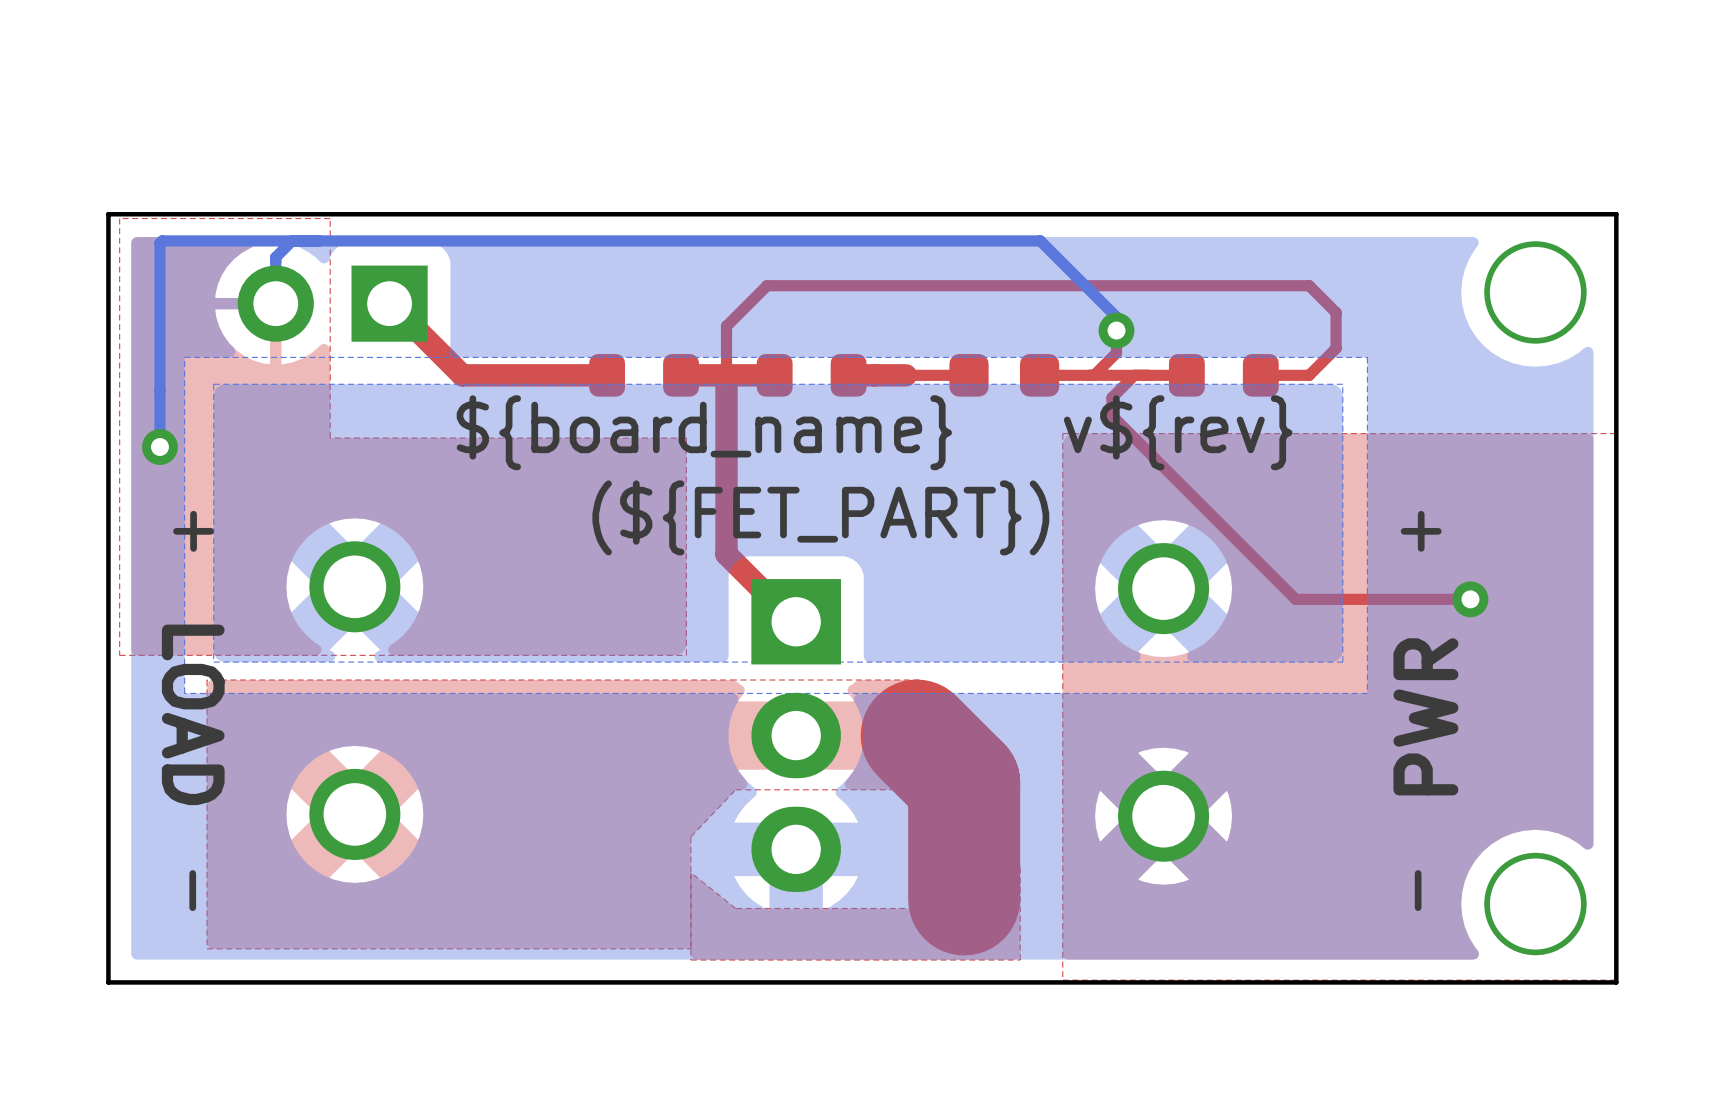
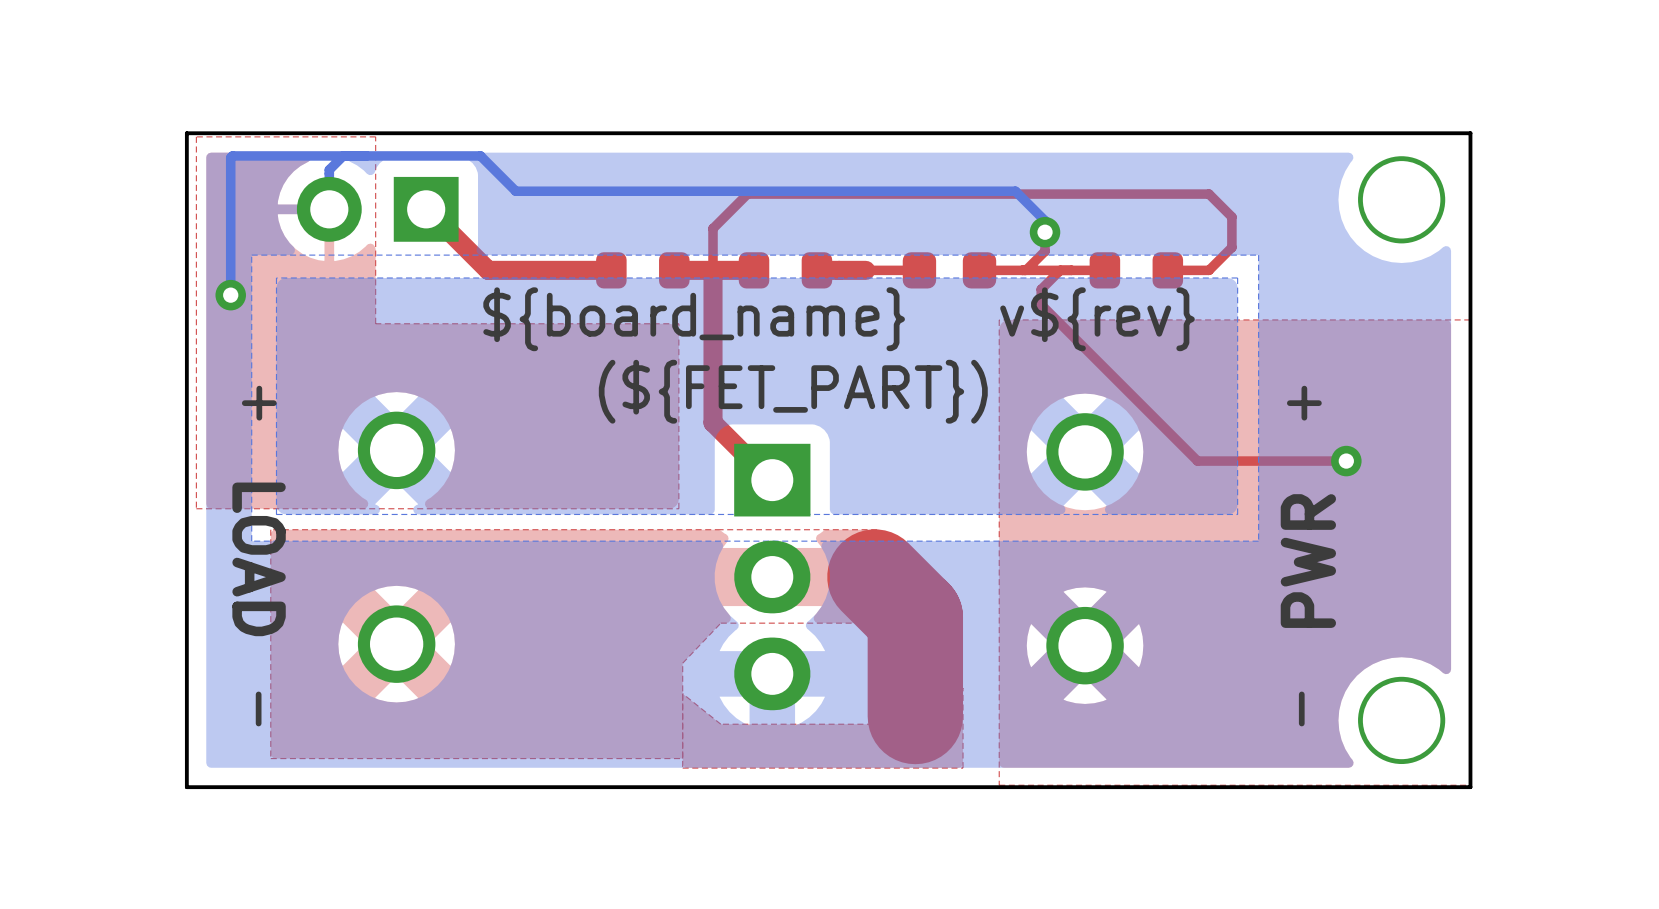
bottom track: (453, 240) (1040, 240) (1081, 282) -> (480, 155) (515, 191) (1015, 191)
bottom track: (159, 404) (159, 447) -> none
via position: (159, 447) -> (230, 295)

